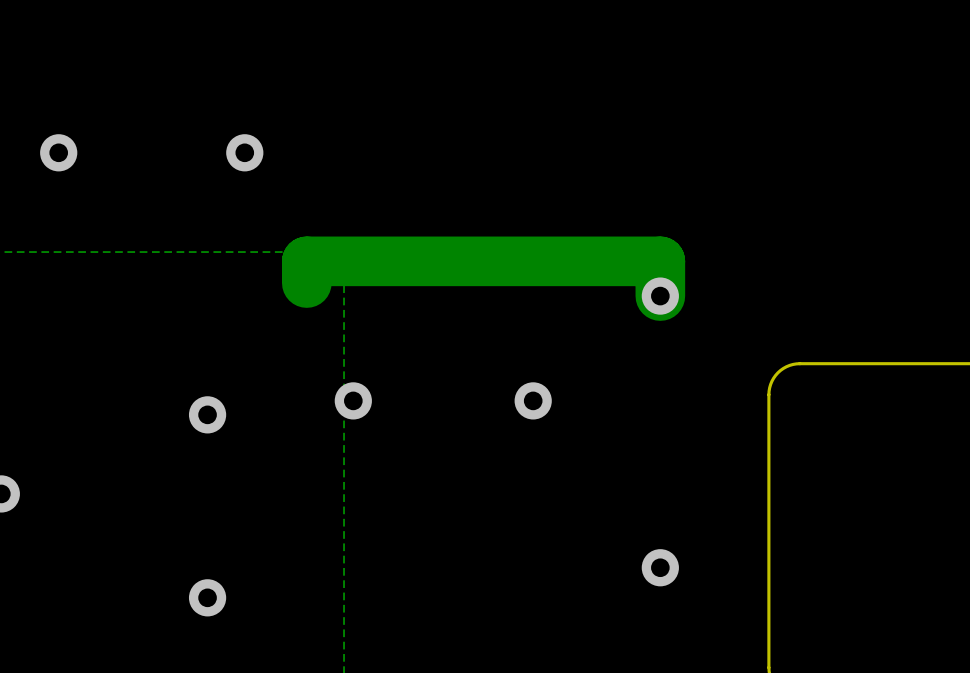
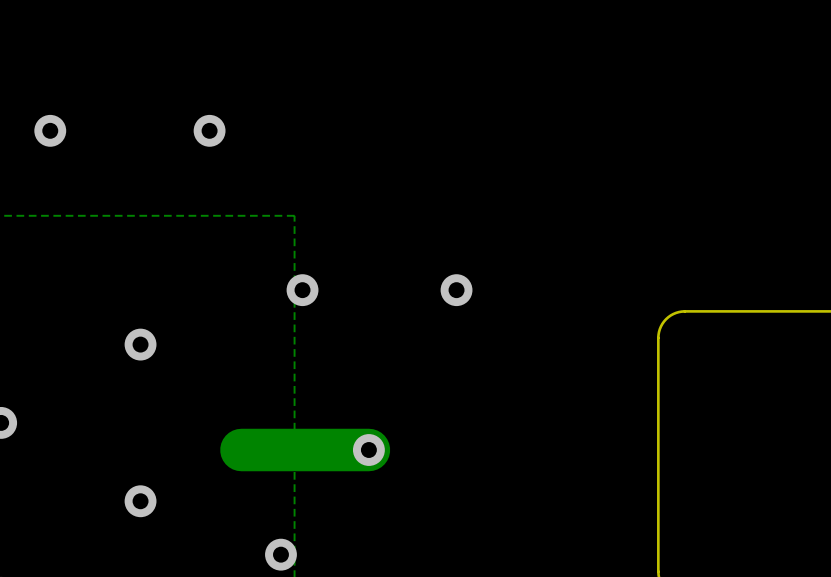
track: (306, 283) (306, 261) (660, 261) (660, 296) -> none
via: (660, 296) -> none
via position: (353, 400) -> (302, 290)
via position: (533, 400) -> (456, 290)
via position: (207, 414) -> (140, 344)
track: none -> (368, 450) (241, 450)
via: none -> (368, 450)
via: (660, 567) -> none
via position: (207, 597) -> (140, 501)
via: none -> (280, 554)

